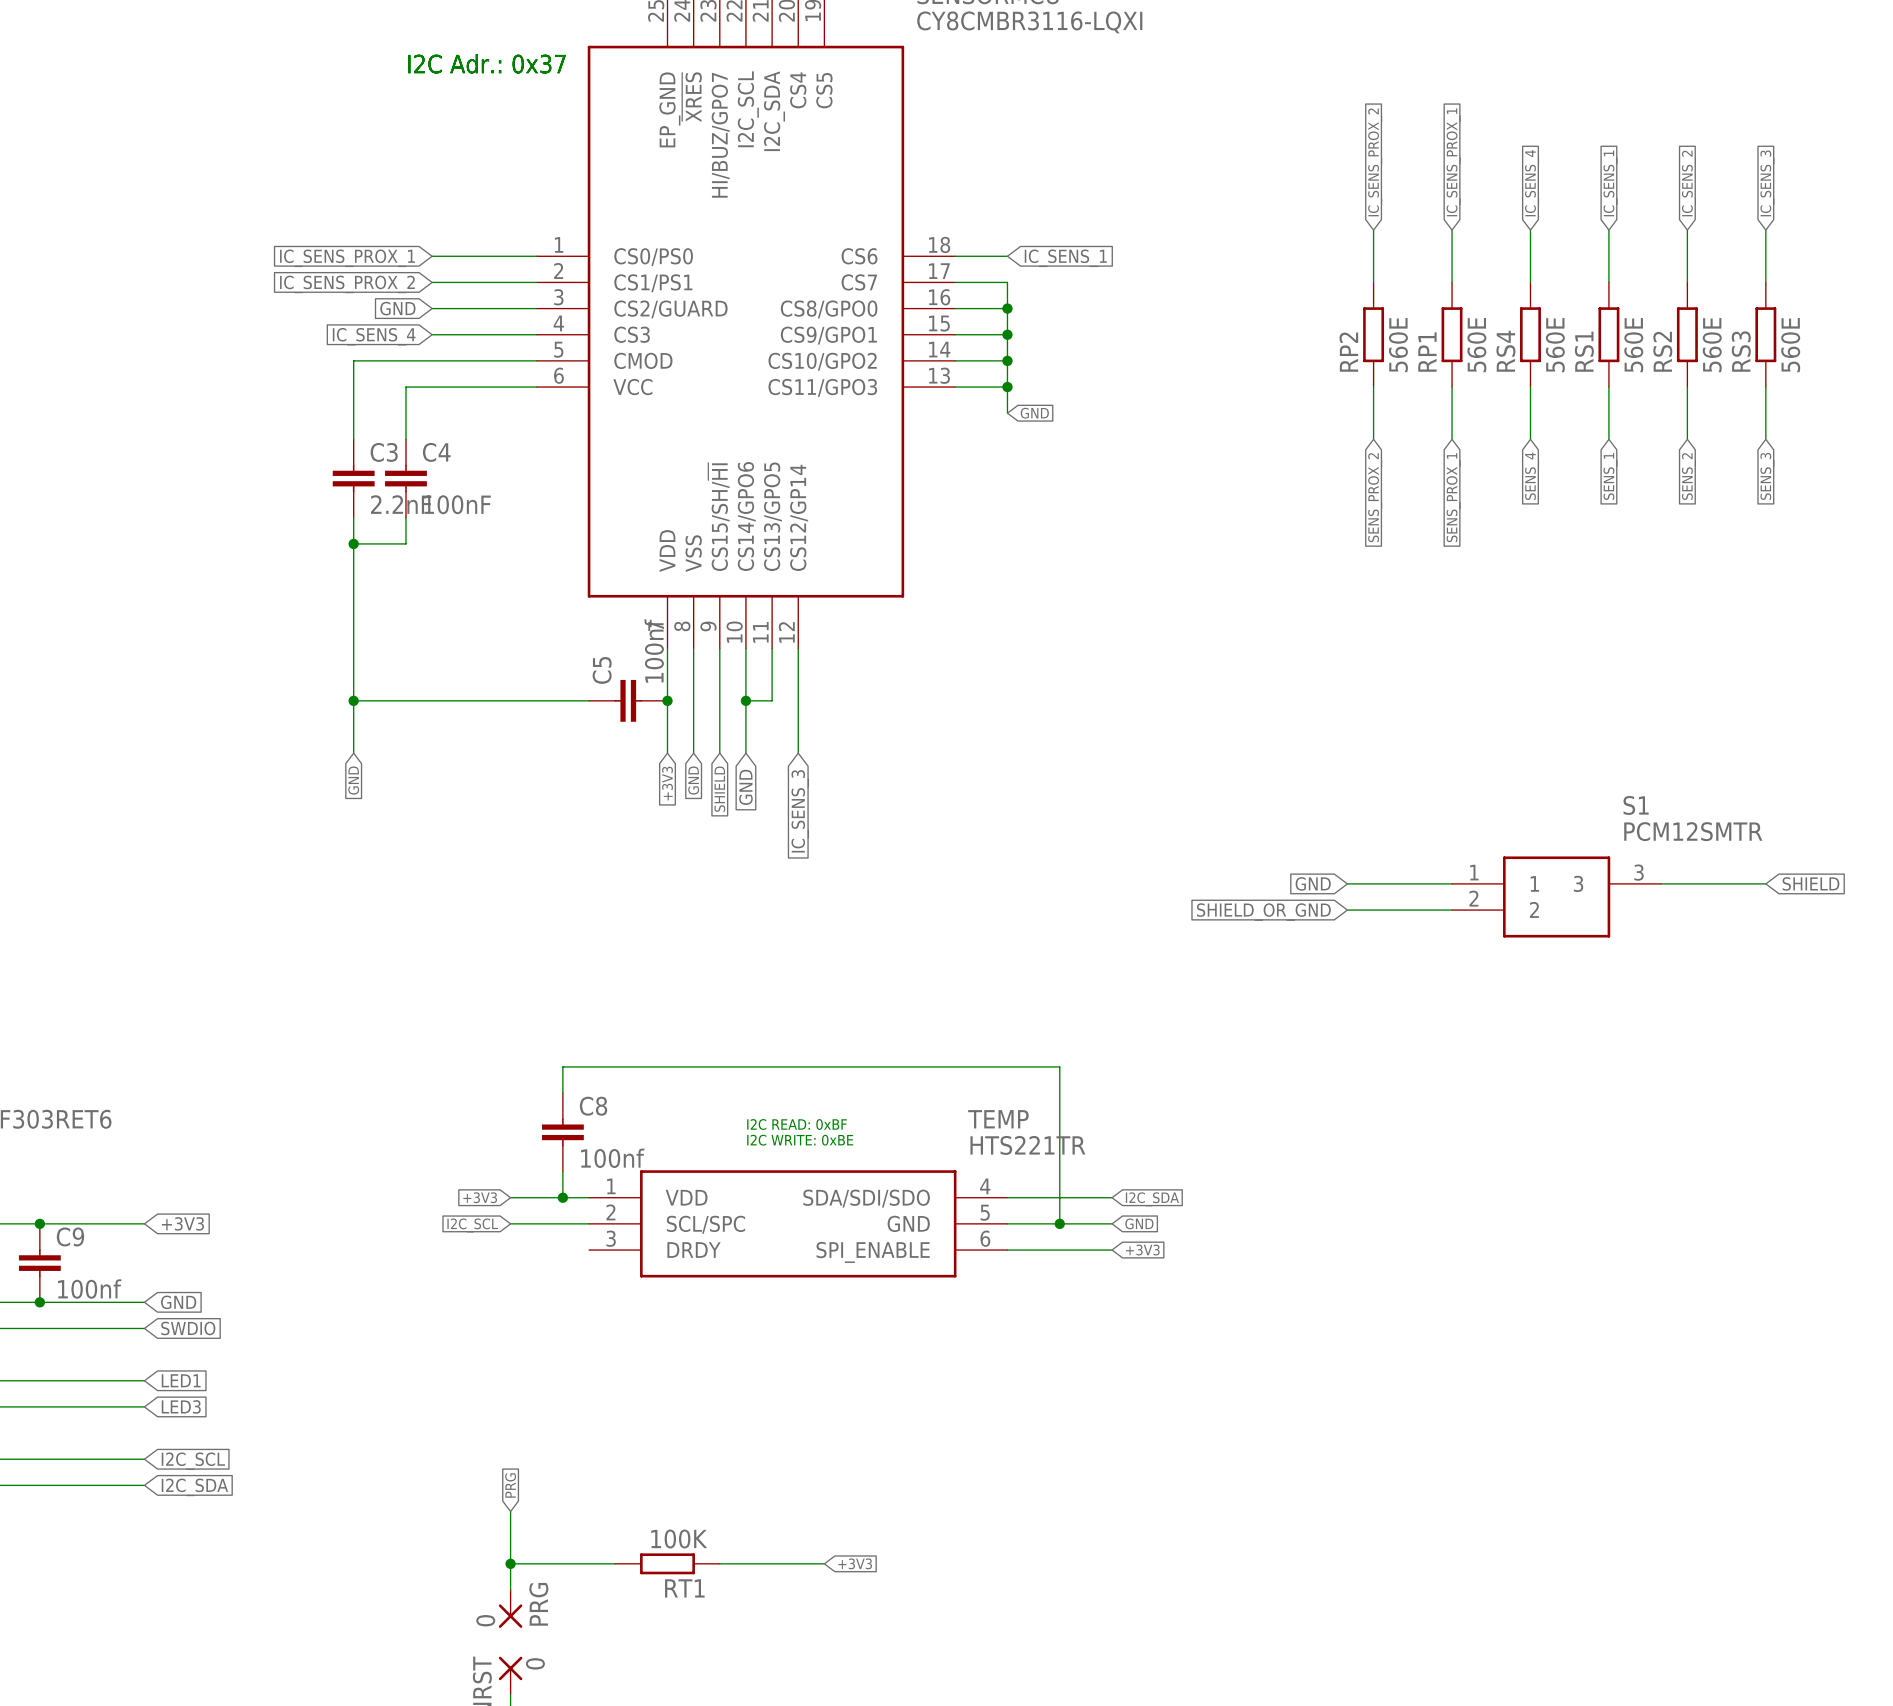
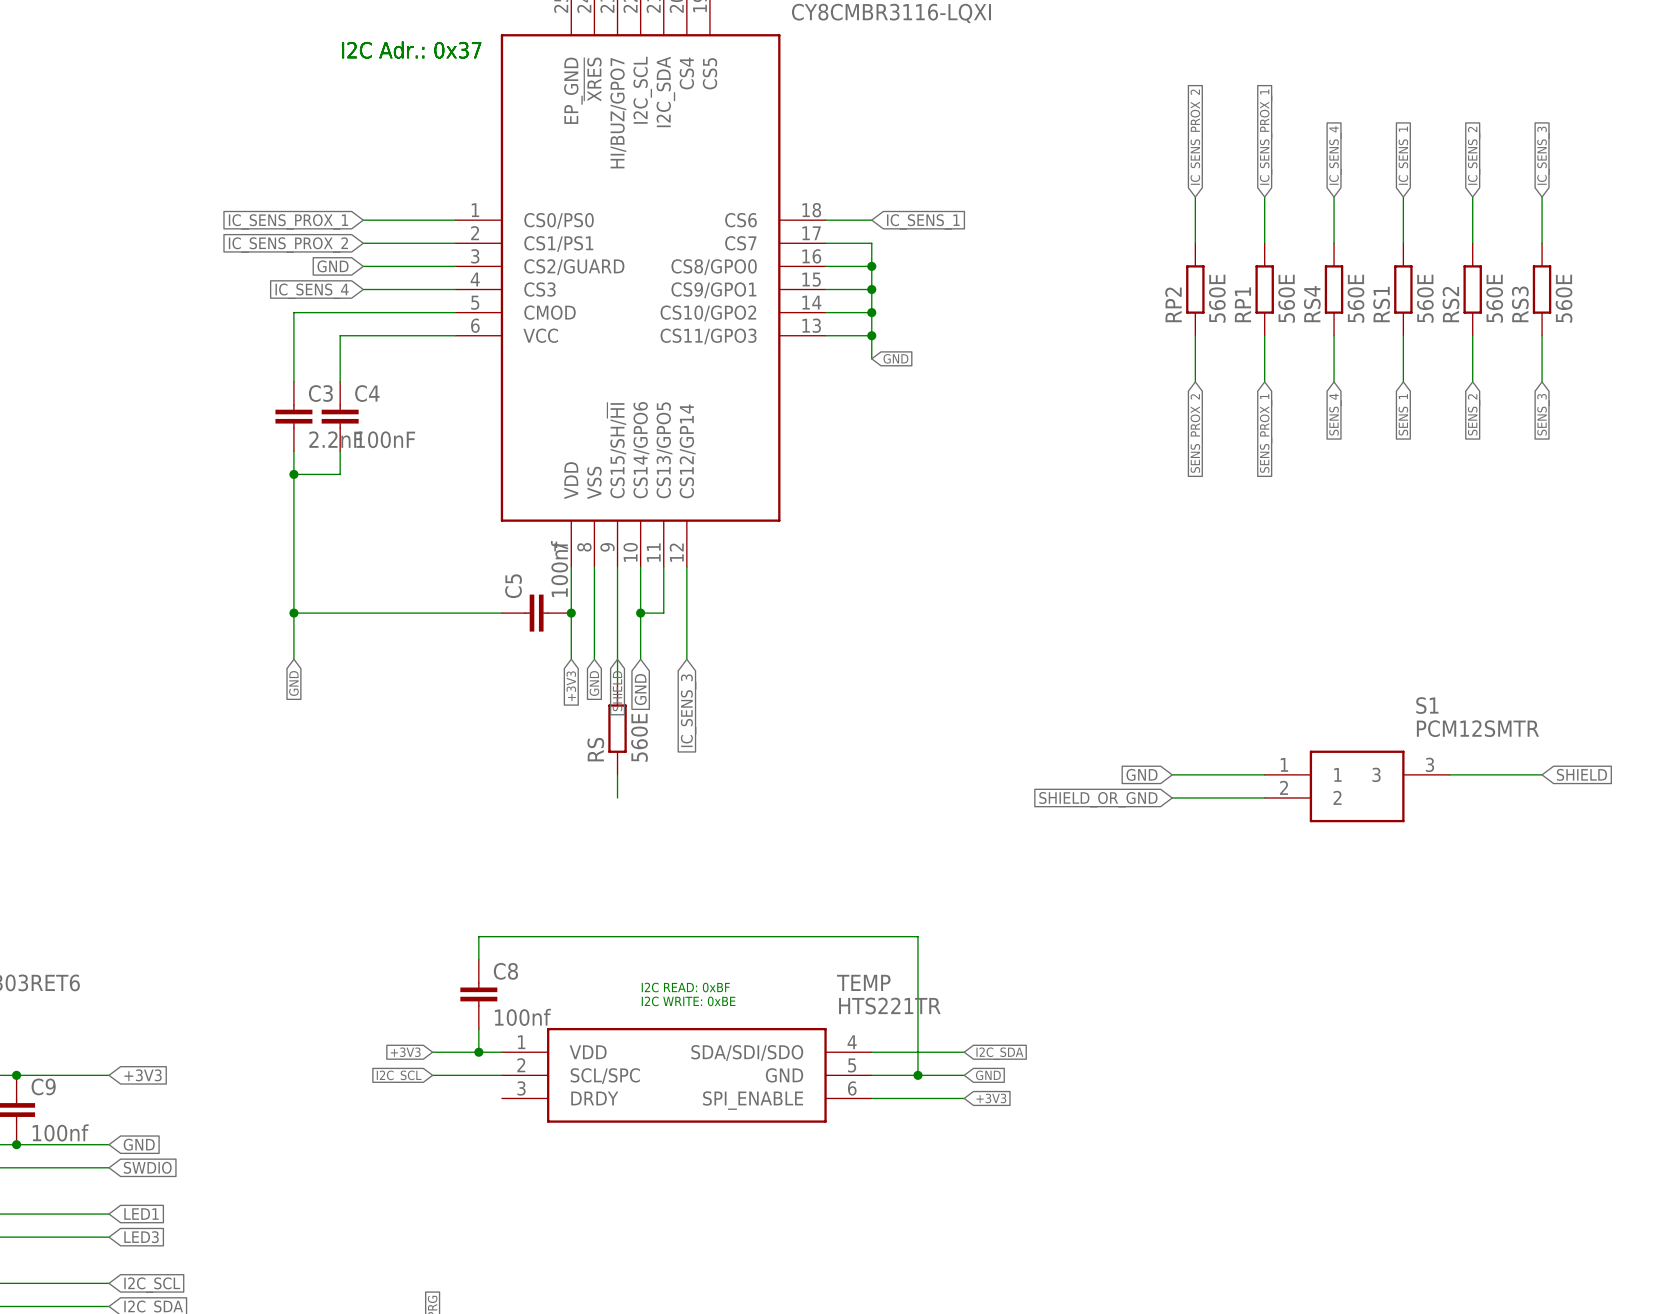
wire: none -> (617, 659) (617, 682)
RS: none -> 560E (617, 728)
wire: none -> (617, 774) (617, 797)

